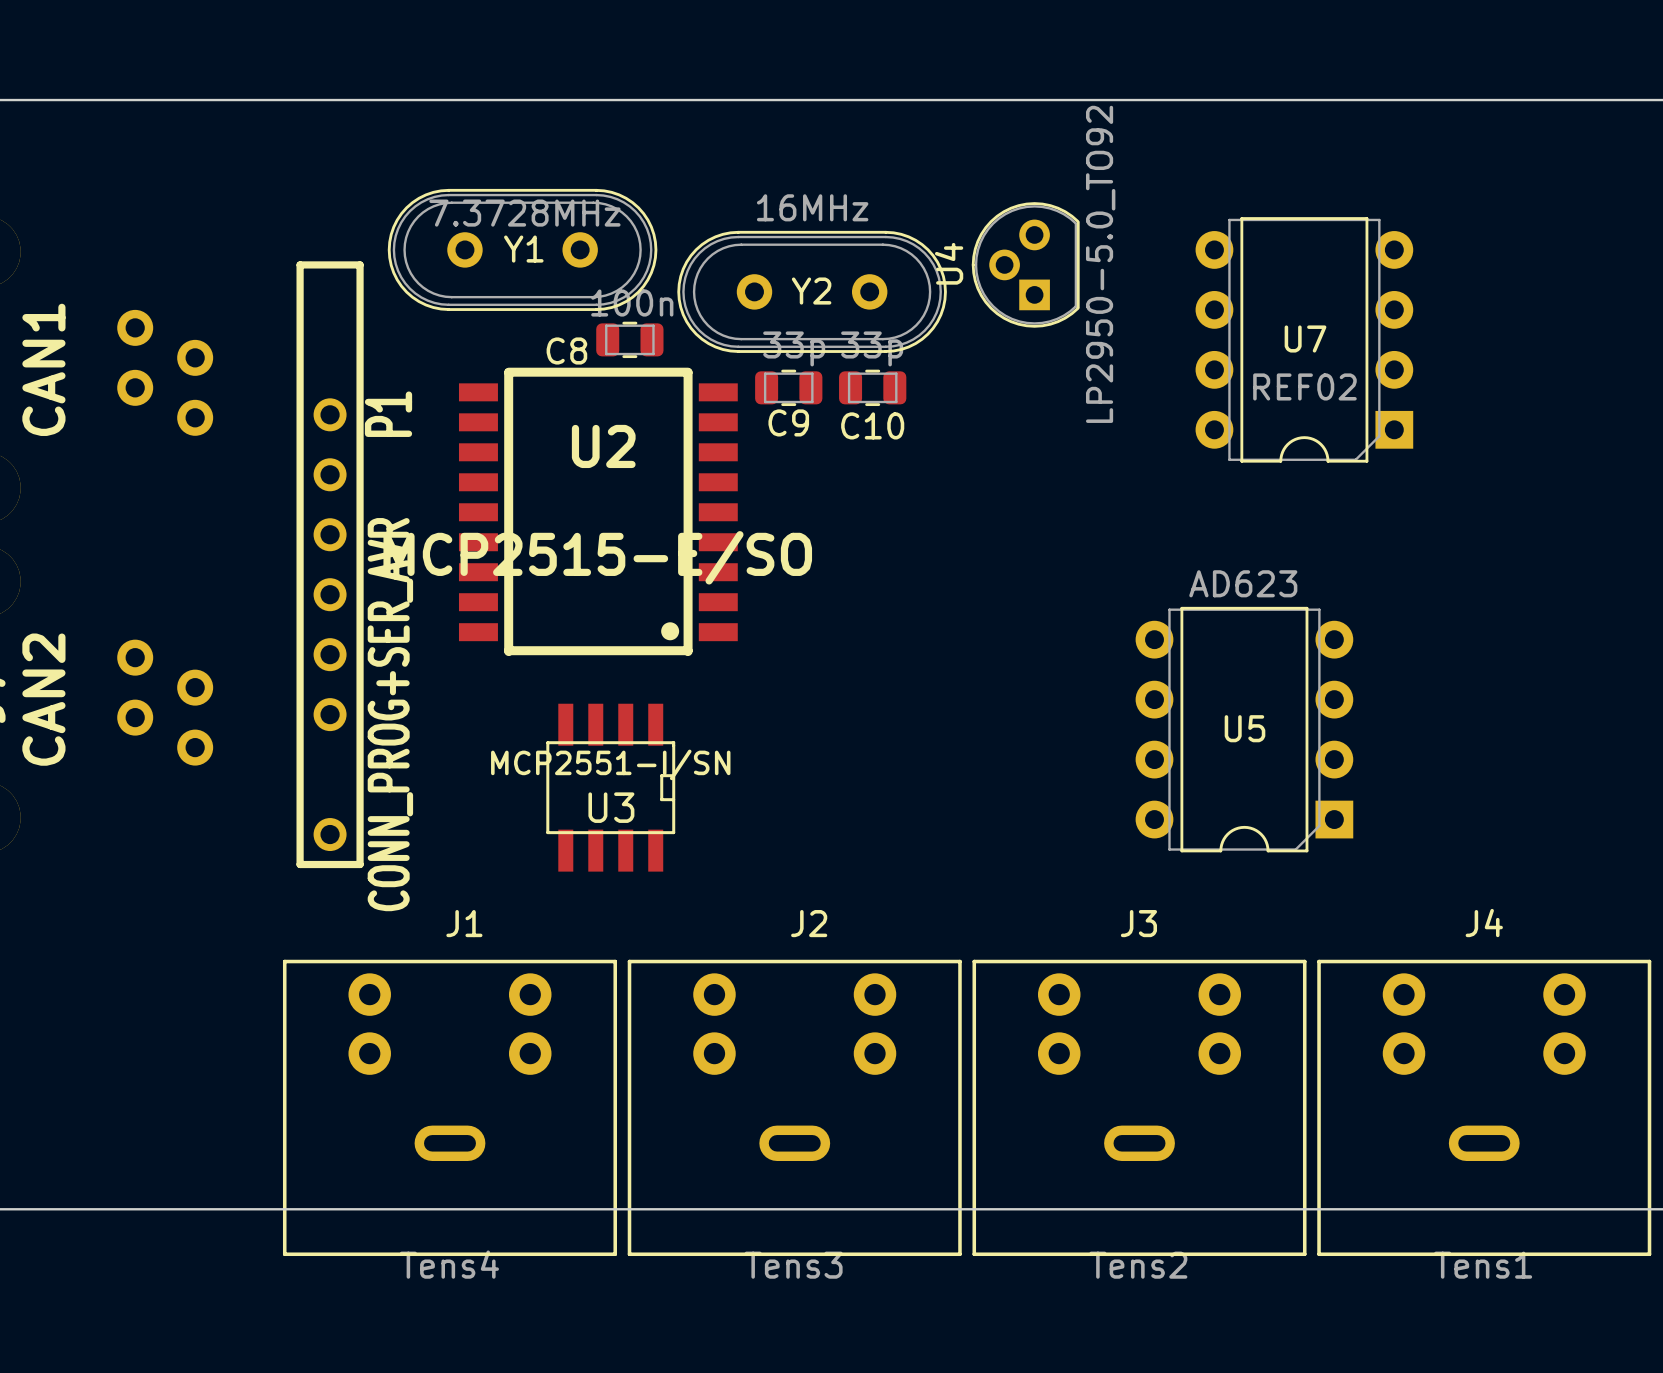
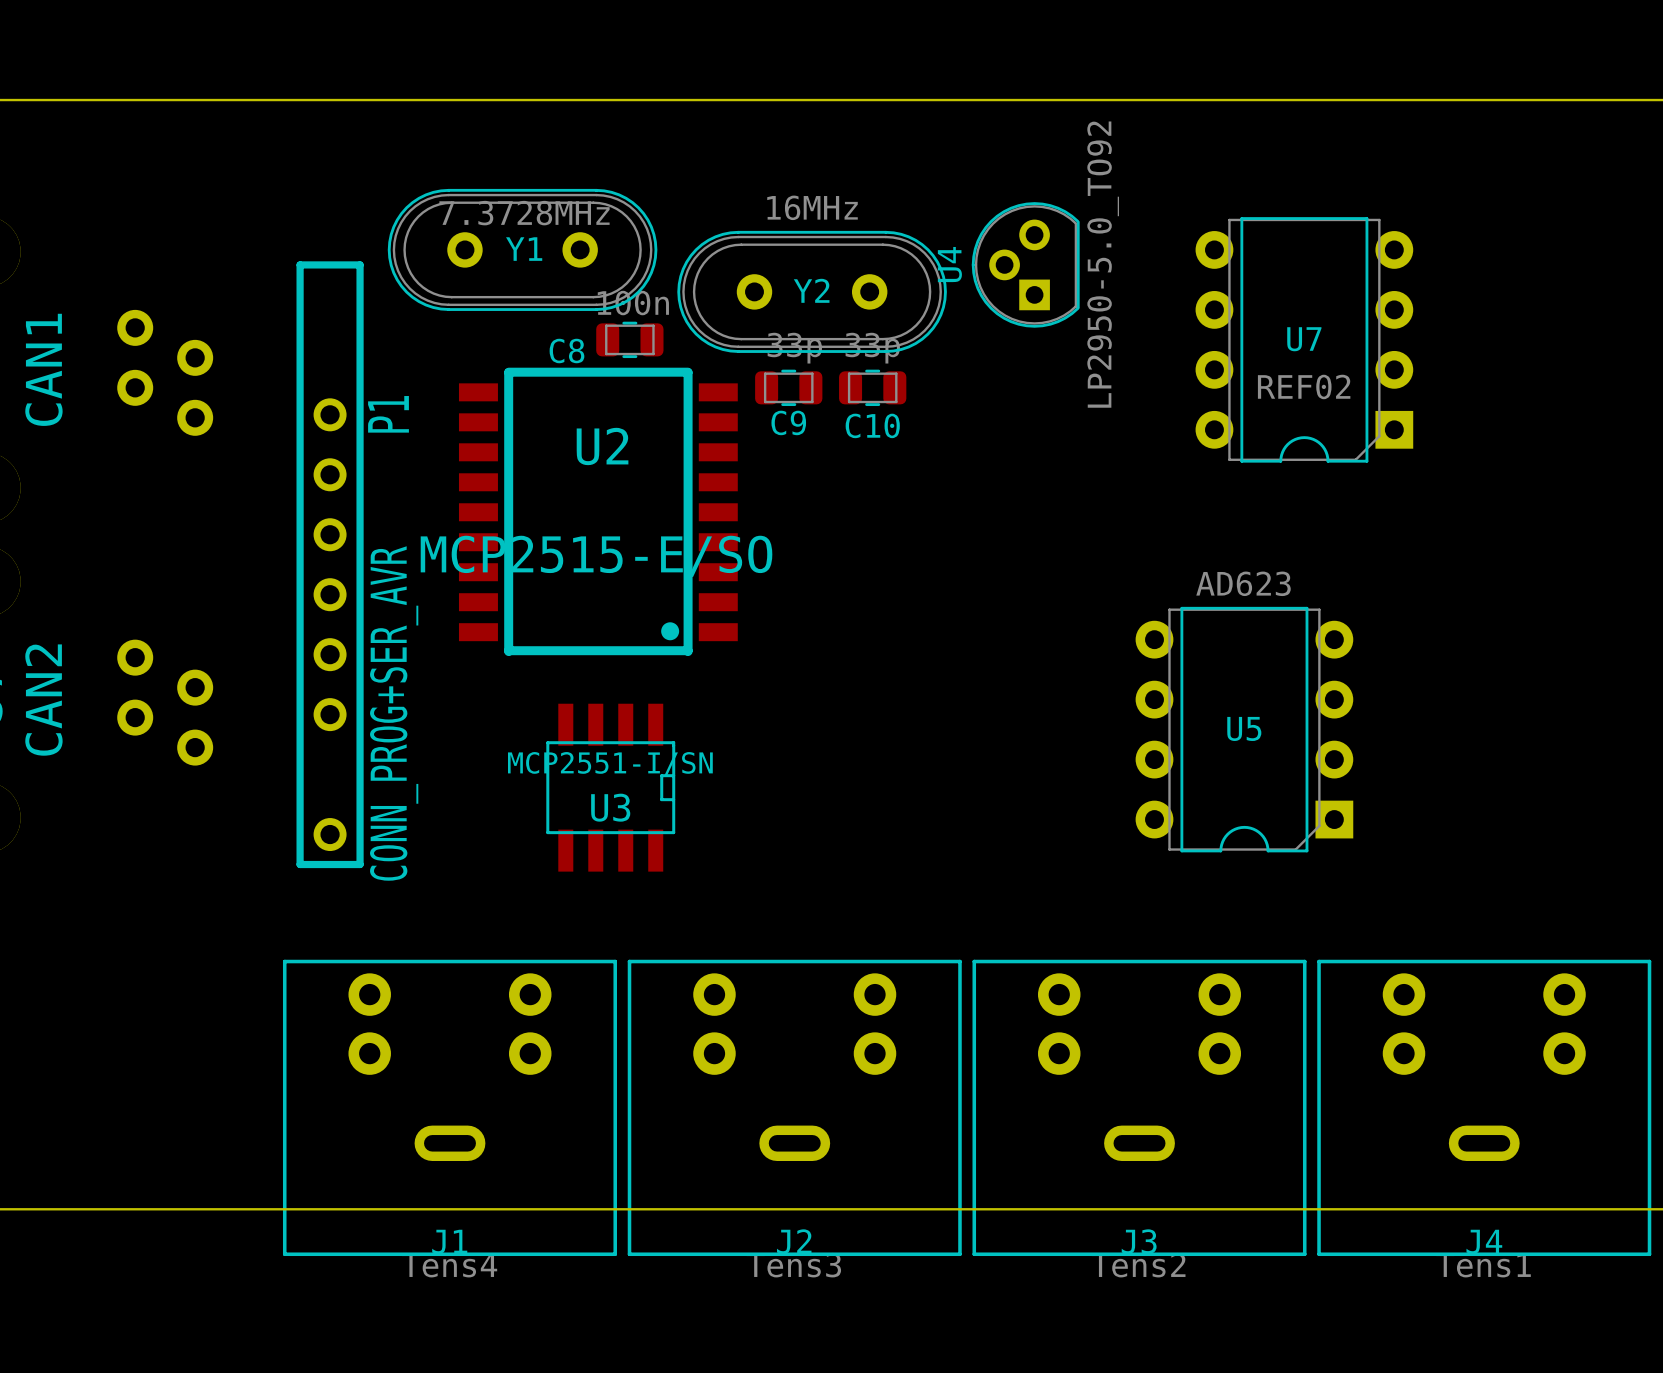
J1 name position: J1 (464, 923) -> J1 (449, 1241)
J2 name position: J2 (809, 923) -> J2 (794, 1241)
J3 name position: J3 (1138, 923) -> J3 (1139, 1241)
J4 name position: J4 (1484, 923) -> J4 (1484, 1241)

